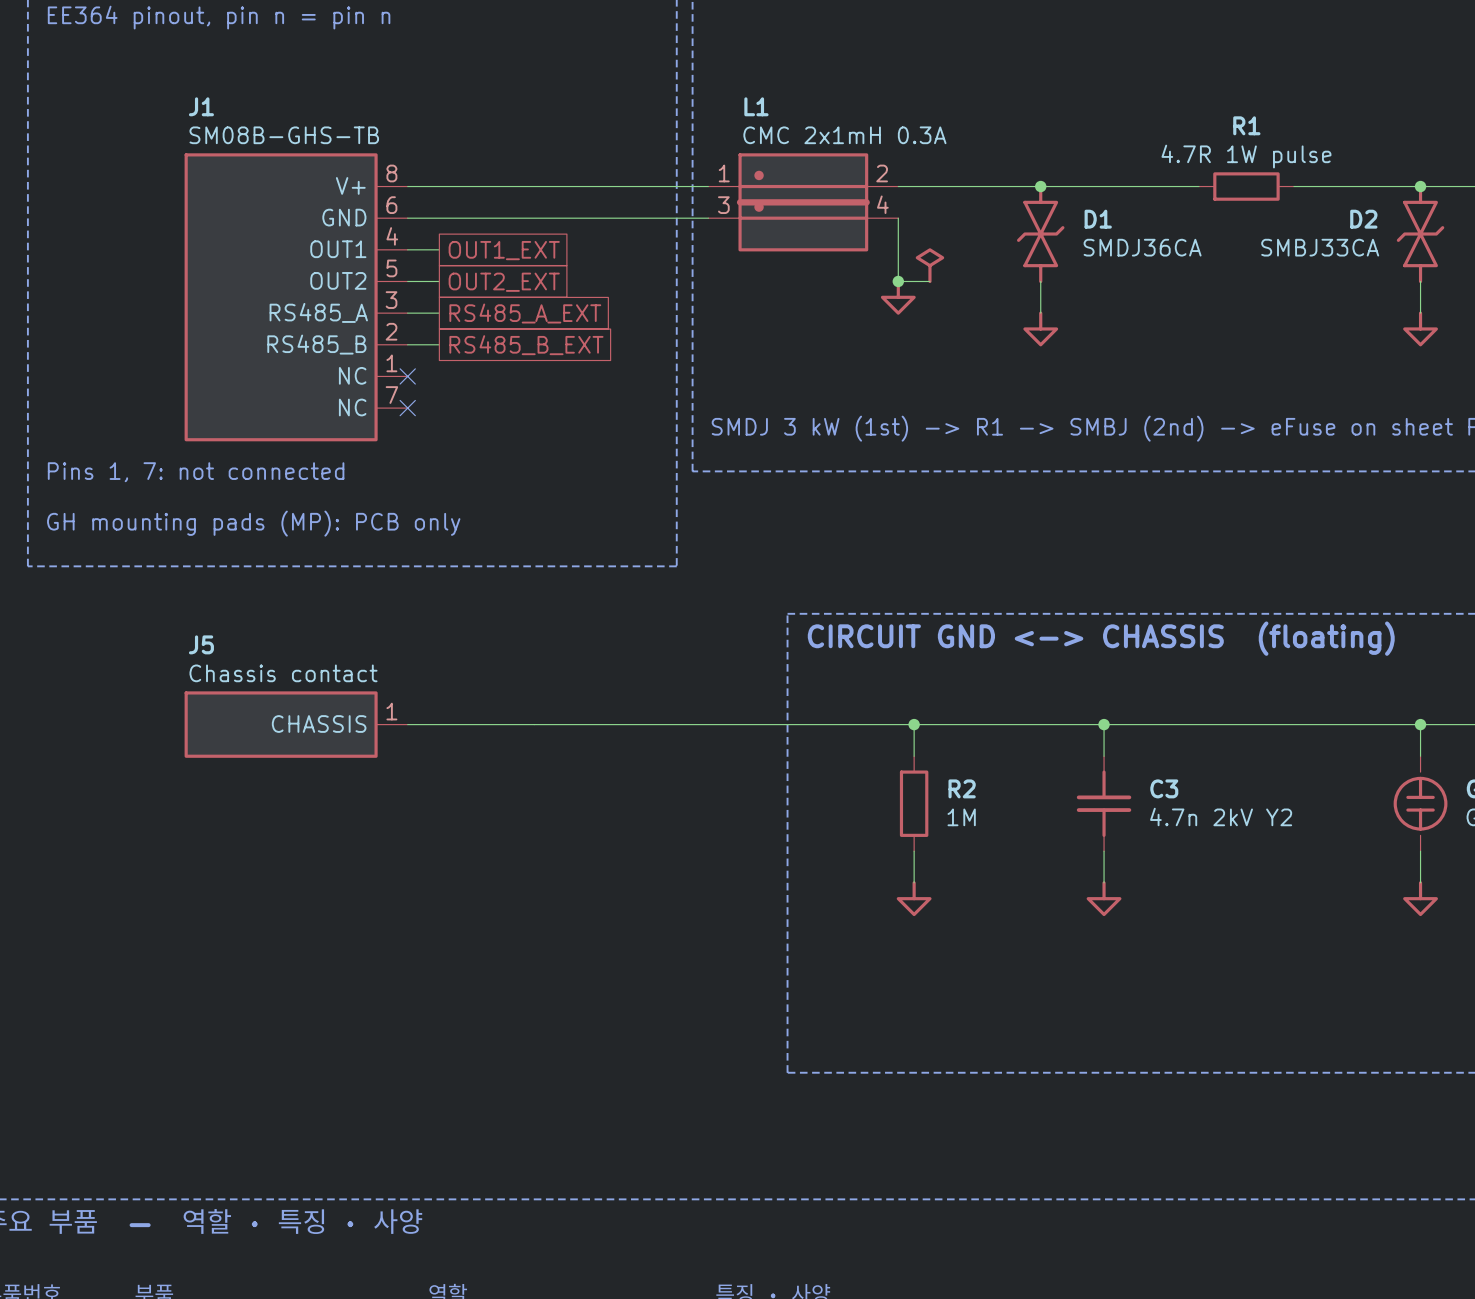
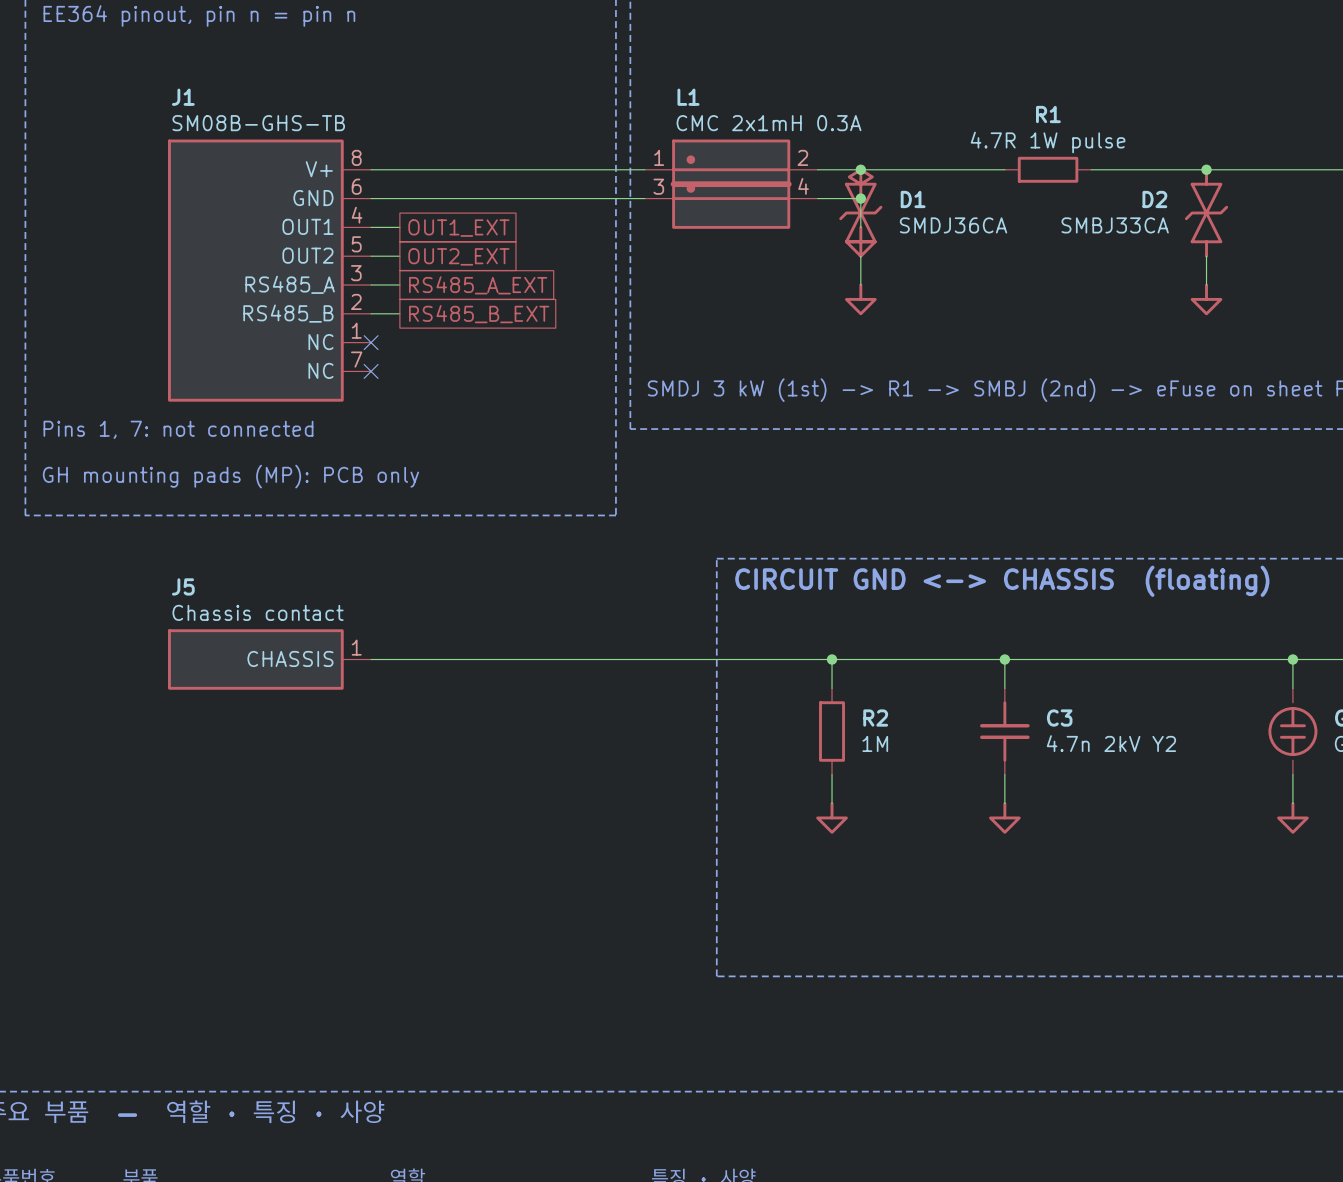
junction: none -> (860, 169)
junction: (1040, 186) -> none
wire: (1104, 186) (1198, 186) -> (1177, 169) (1091, 169)
R1 position: (1246, 186) -> (1048, 169)
junction: none -> (1206, 169)
junction: (1420, 186) -> none
wire: (898, 218) (898, 281) (929, 281) -> (817, 198) (860, 198) (860, 227)
junction: none -> (860, 198)
D1 position: (1040, 234) -> (860, 212)
D2 position: (1420, 234) -> (1206, 212)
power symbol position: (929, 265) -> (860, 184)
power symbol: none -> (860, 241)
junction: (898, 281) -> none
wire: (1040, 281) (1040, 313) -> (860, 256) (860, 285)
wire: (1420, 281) (1420, 313) -> (1206, 256) (1206, 285)
power symbol: (898, 297) -> none
power symbol: none -> (860, 299)
power symbol: (1040, 328) -> none
power symbol position: (1420, 328) -> (1206, 299)

